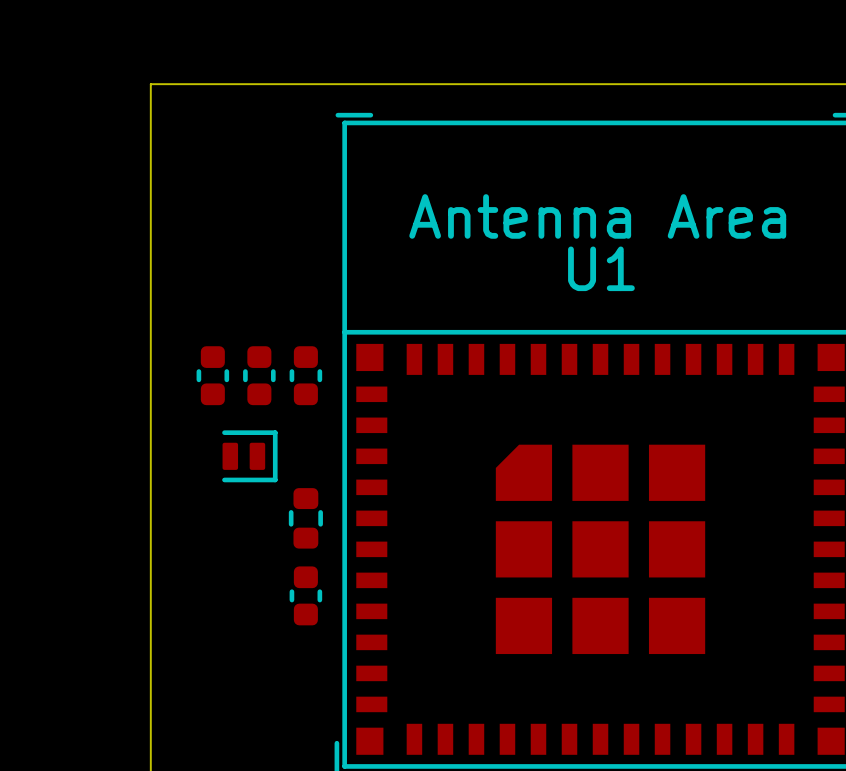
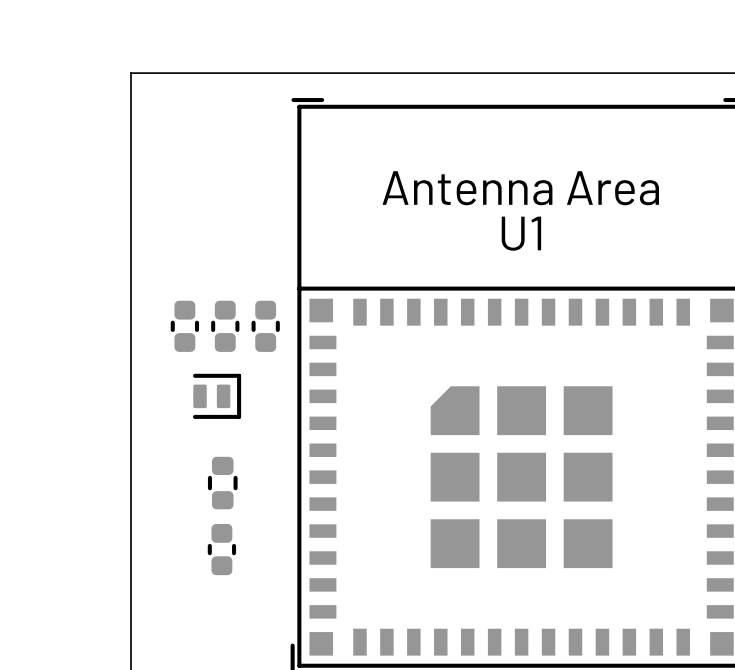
part position: (305, 518) -> (222, 483)
part position: (305, 595) -> (221, 549)

